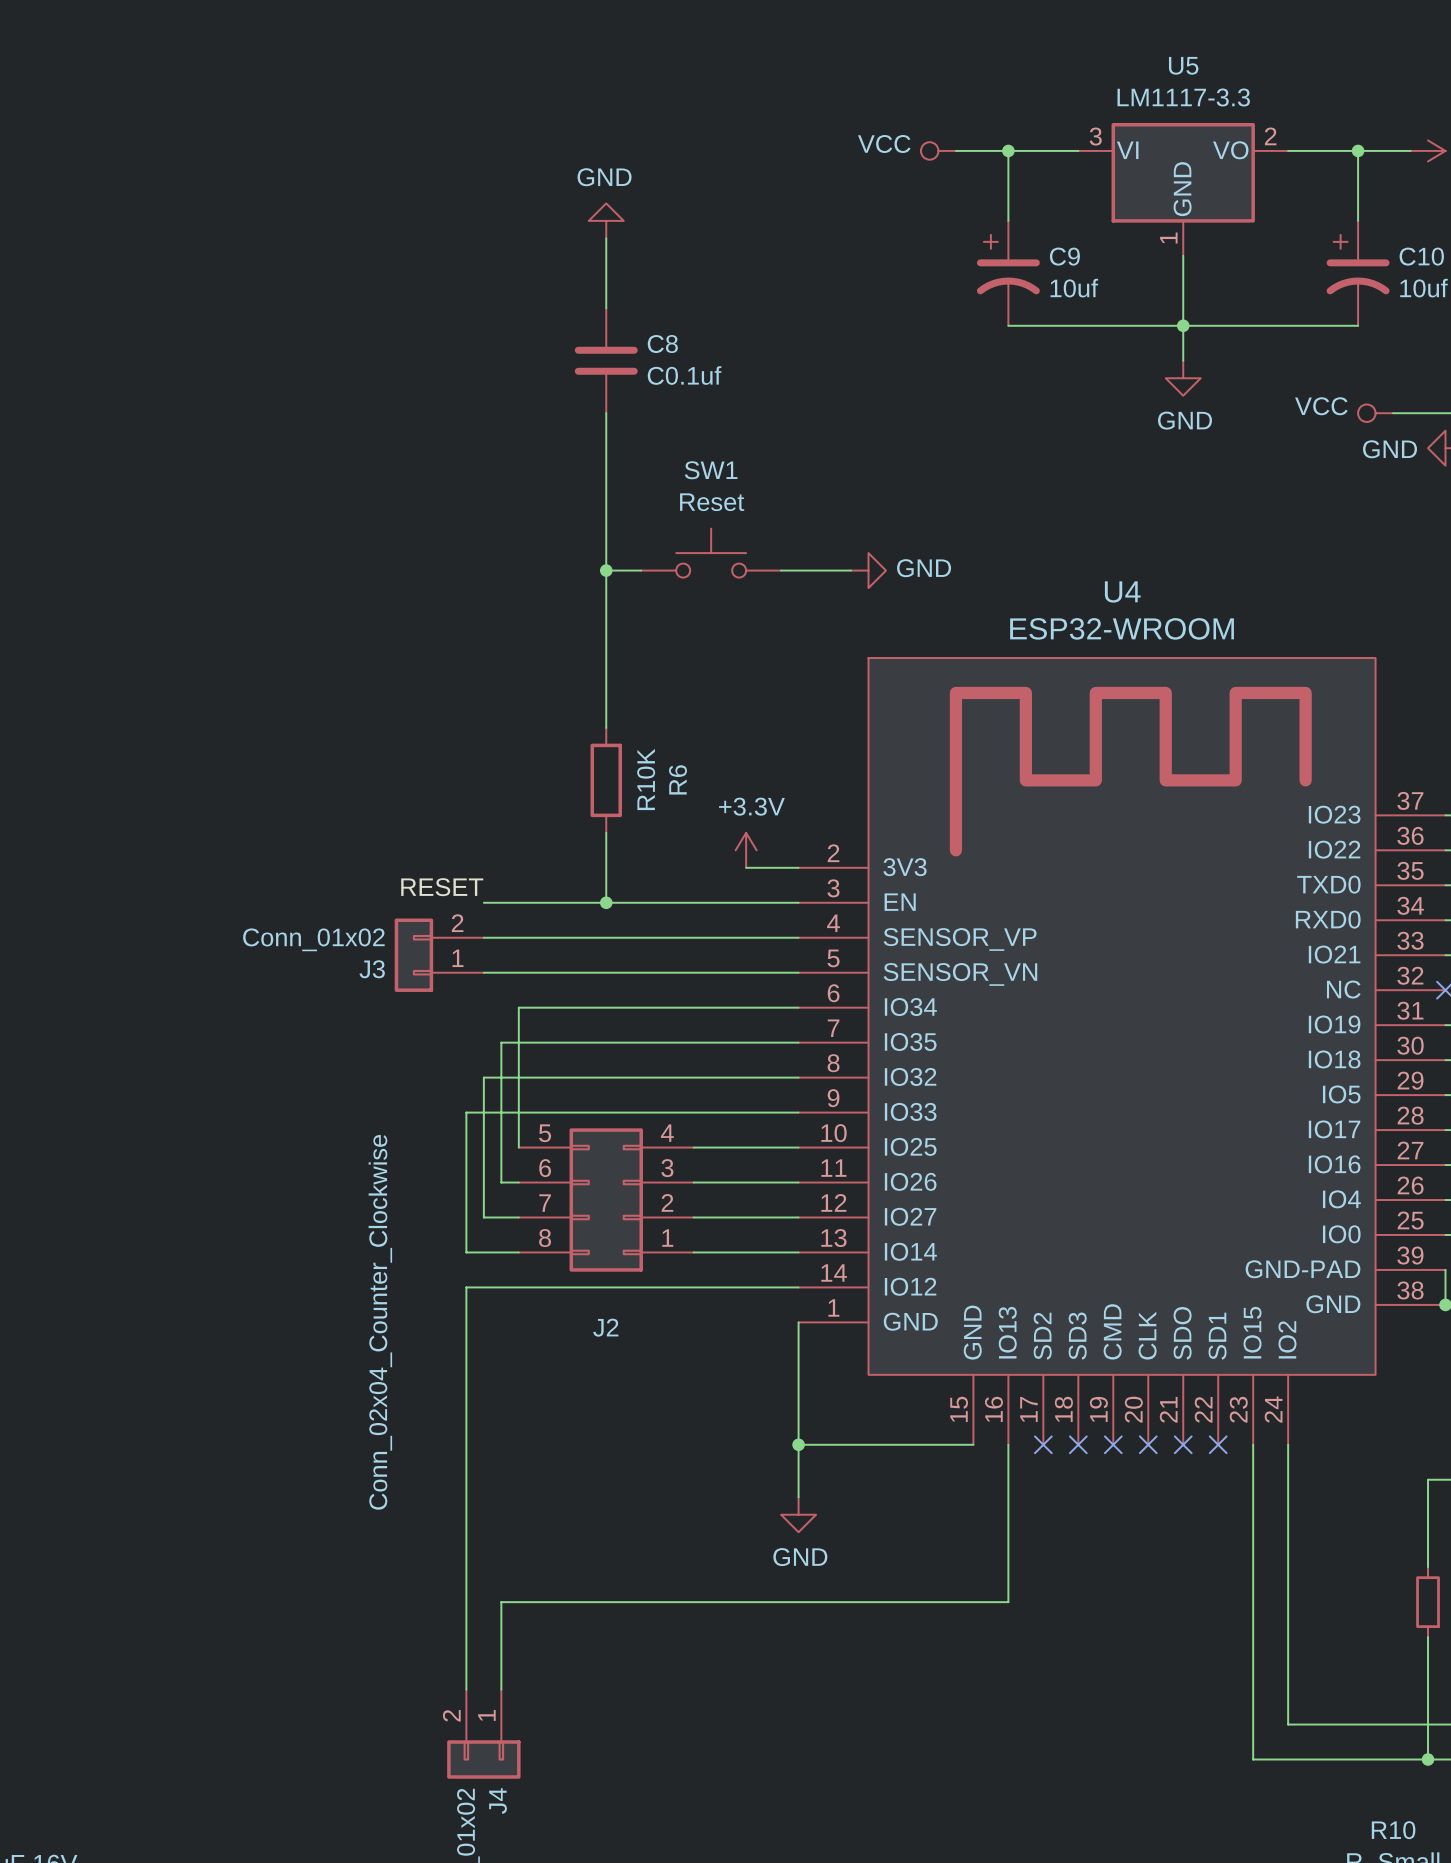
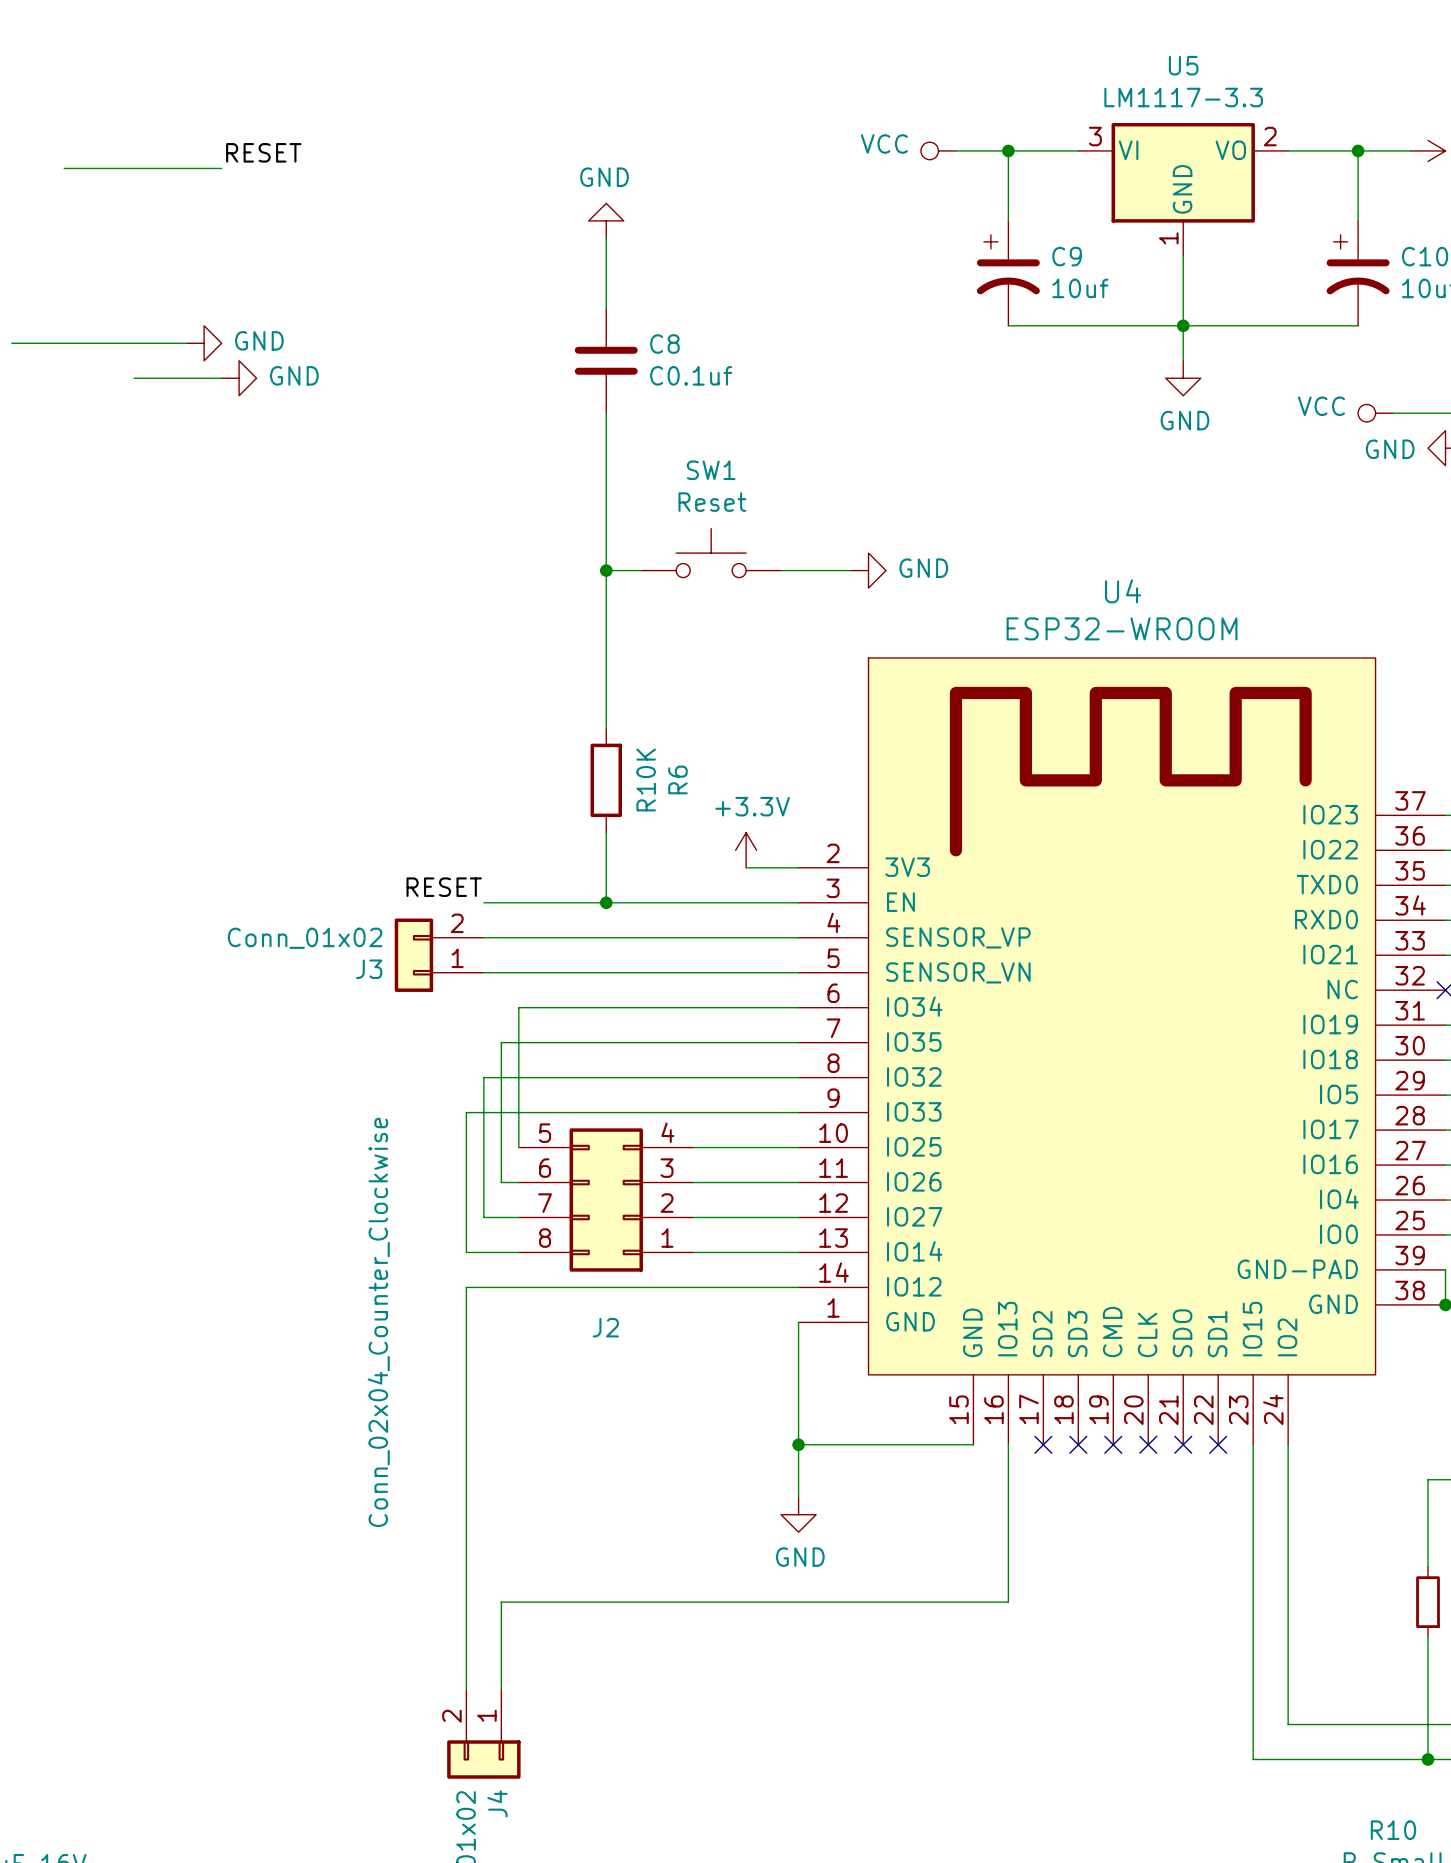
label: none -> RESET (263, 152)
wire: none -> (64, 168) (221, 168)
wire: none -> (11, 343) (186, 343)
power symbol: none -> GND (204, 343)
wire: none -> (134, 378) (221, 378)
power symbol: none -> GND (239, 378)

